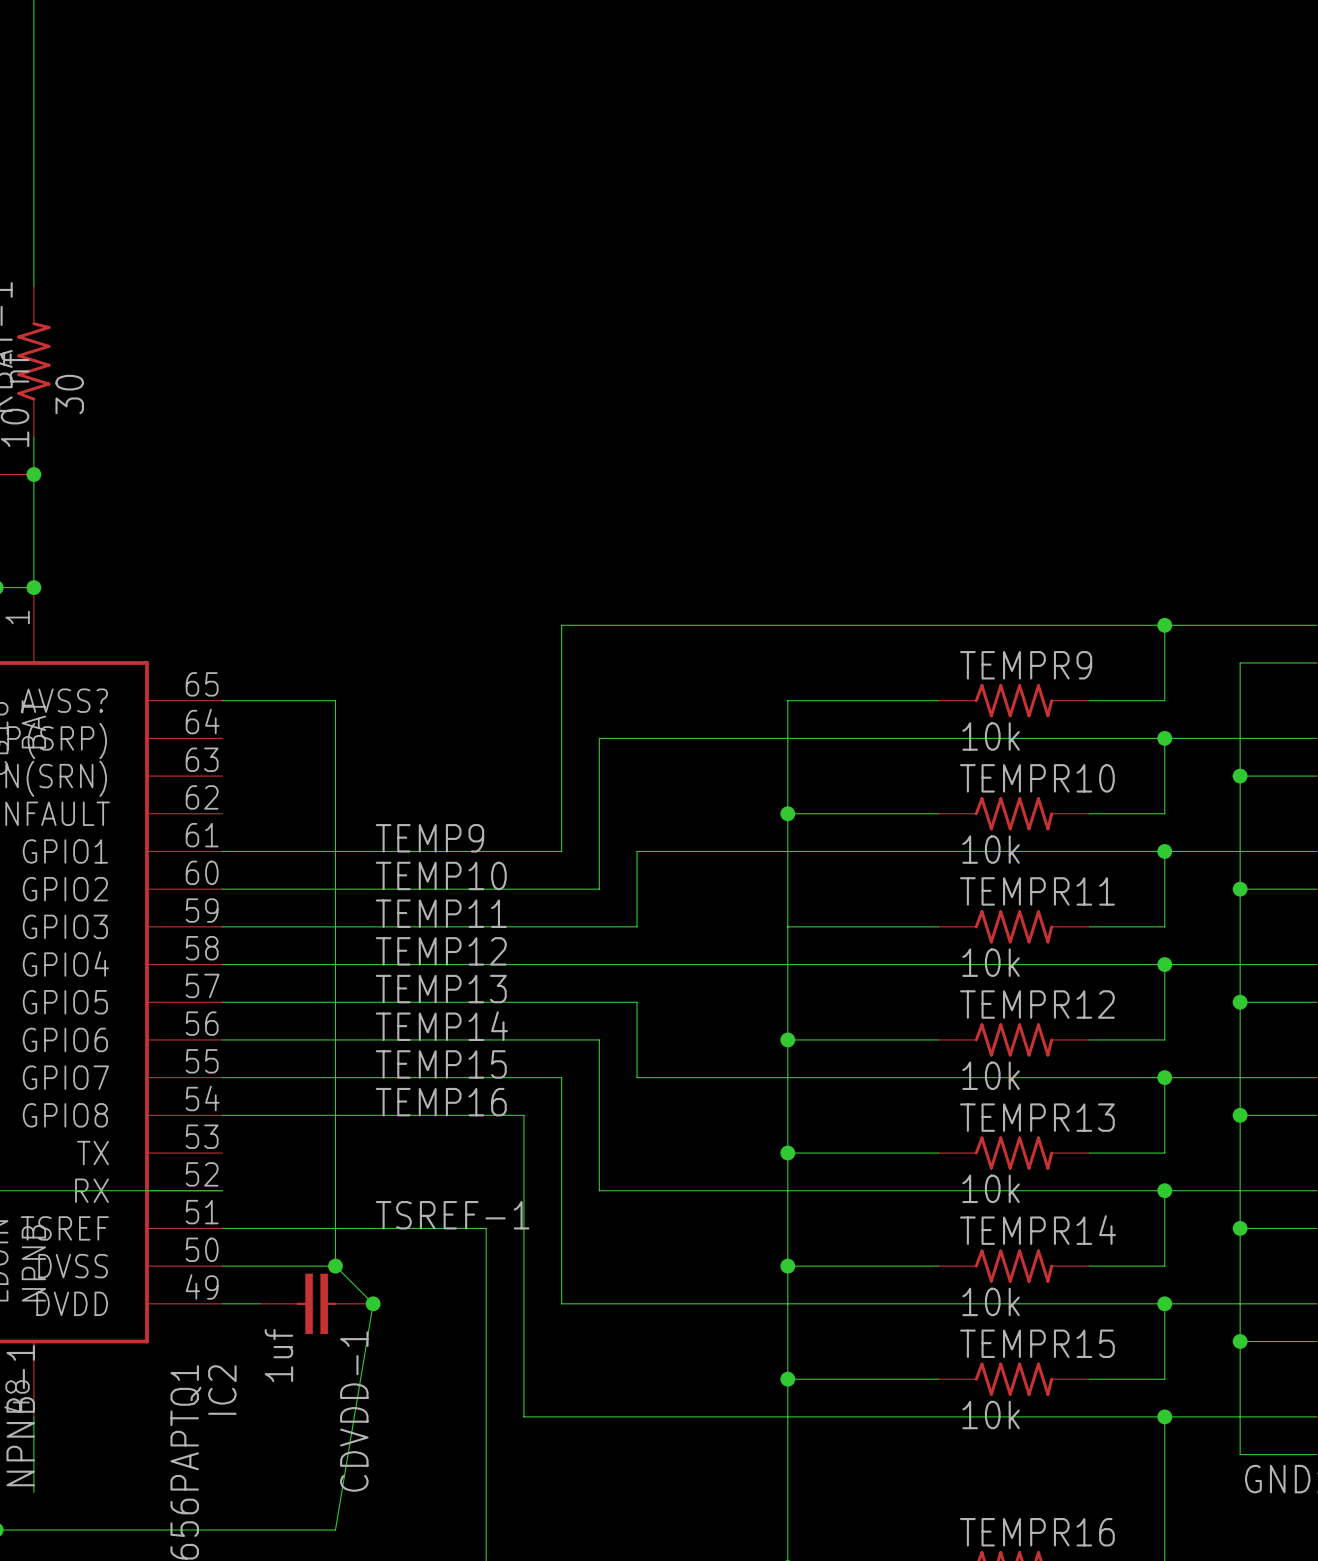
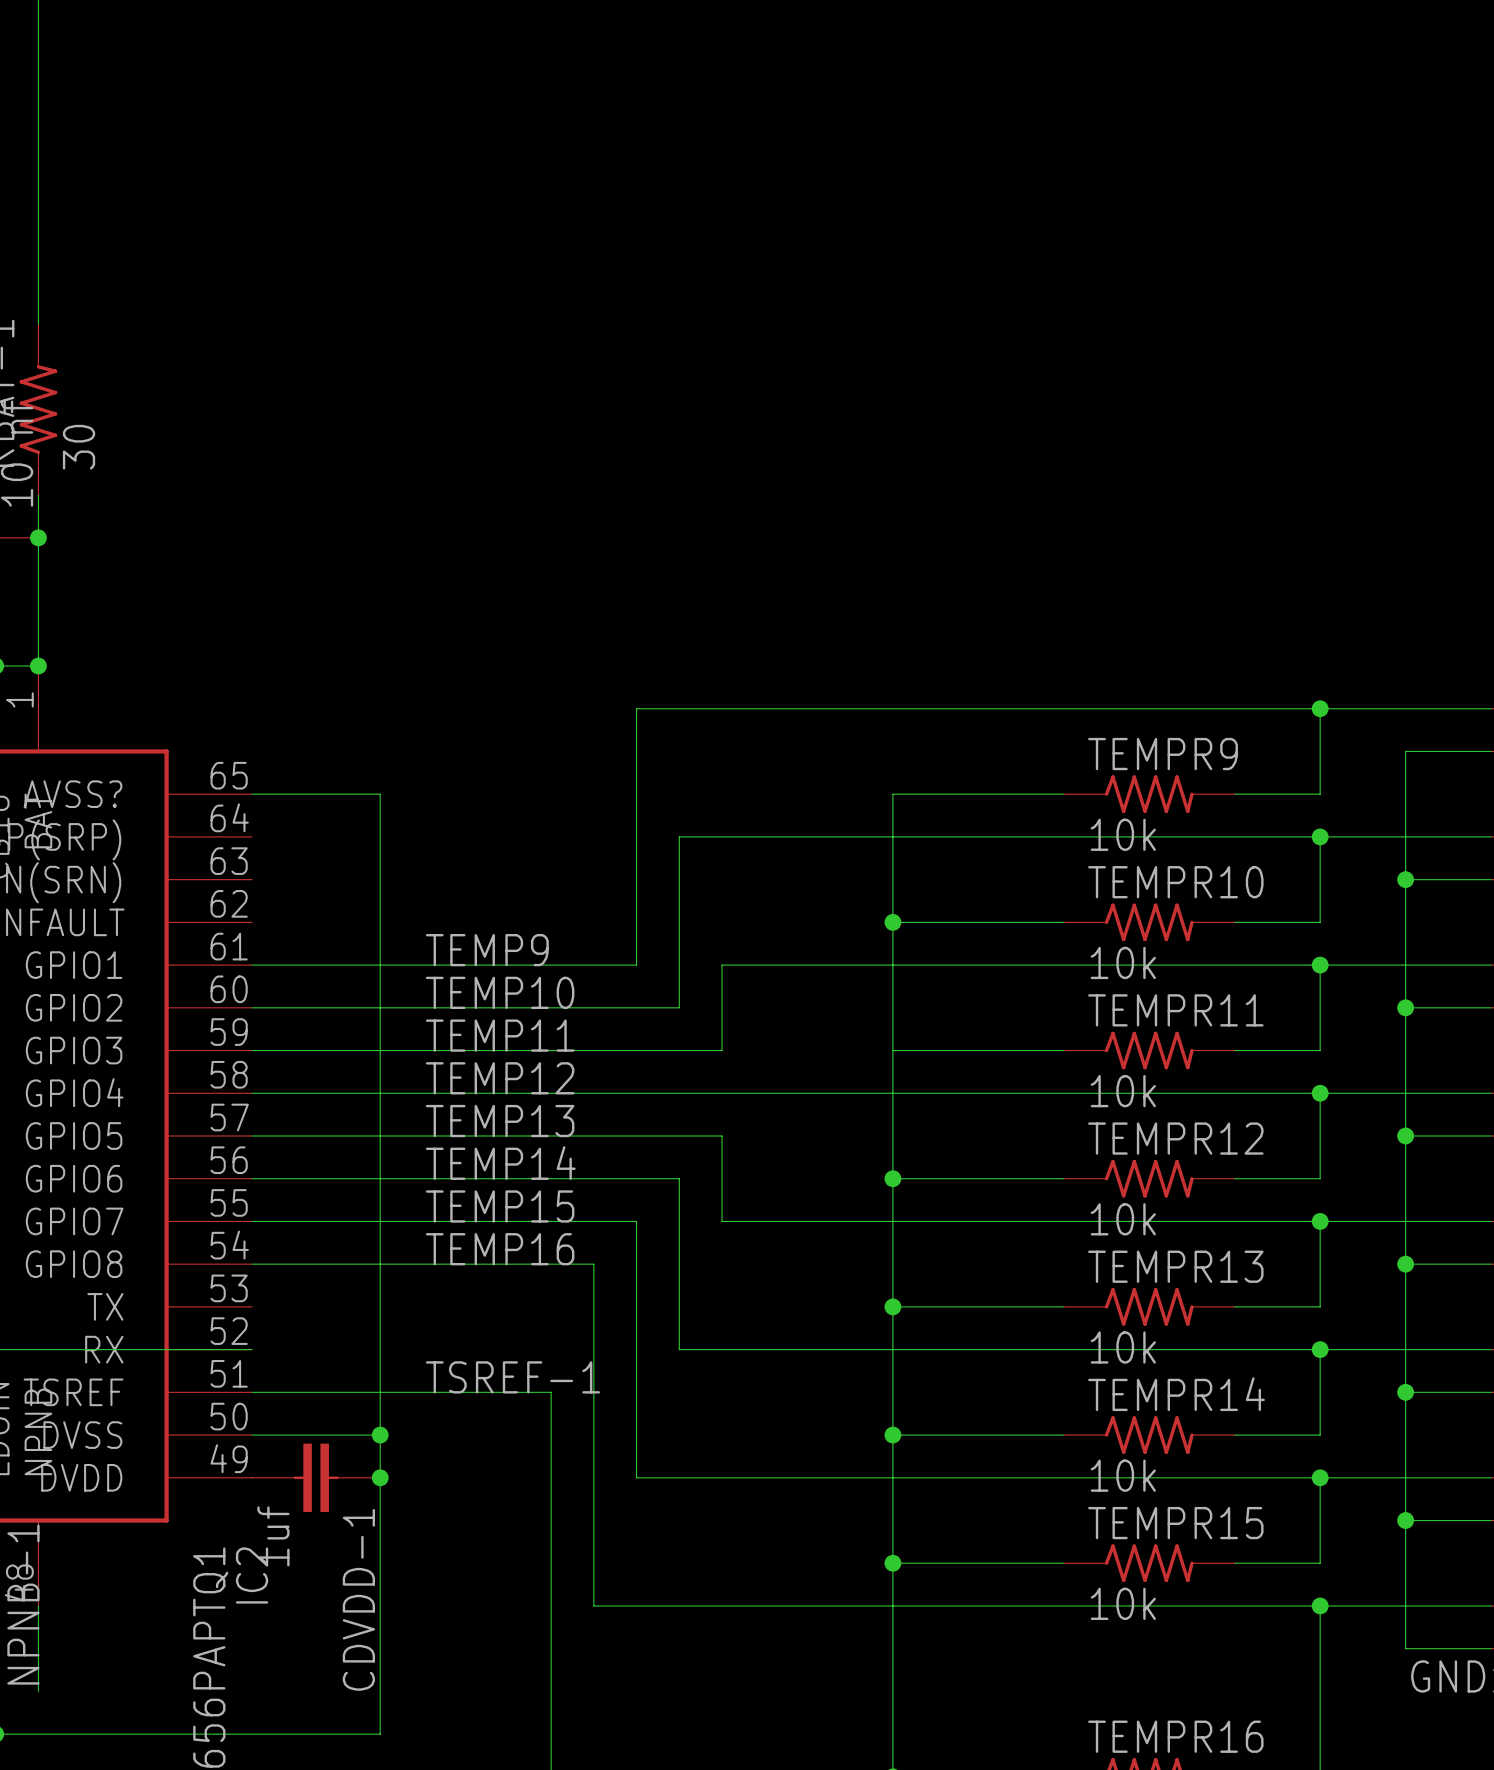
wire: (335, 1266) (373, 1303) (335, 1529) -> (380, 1435) (380, 1734)
CDVDD-1 position: (316, 1303) -> (316, 1477)
junction position: (373, 1303) -> (380, 1477)

